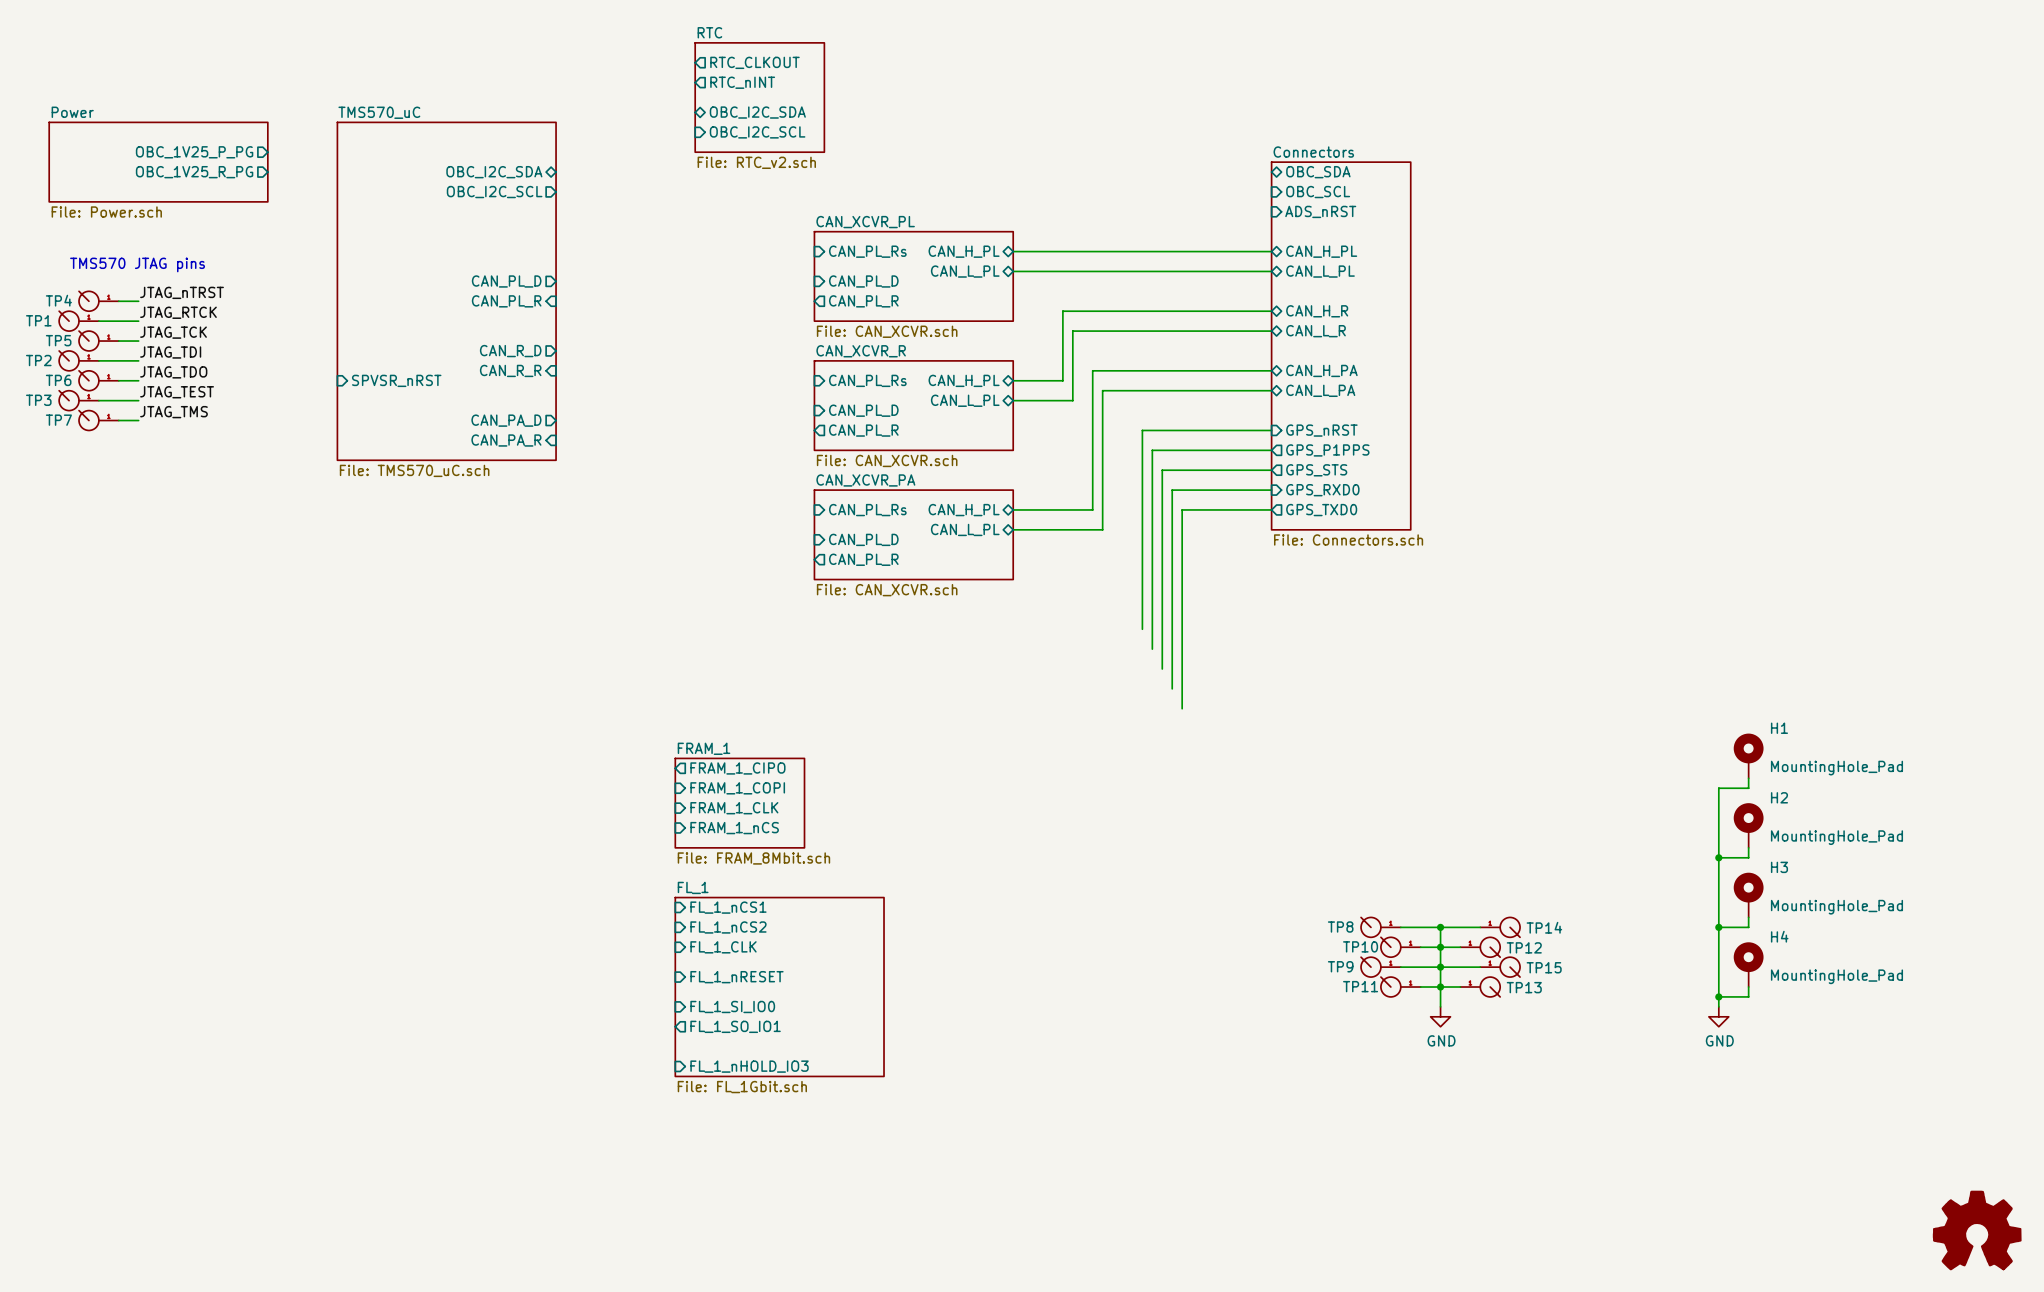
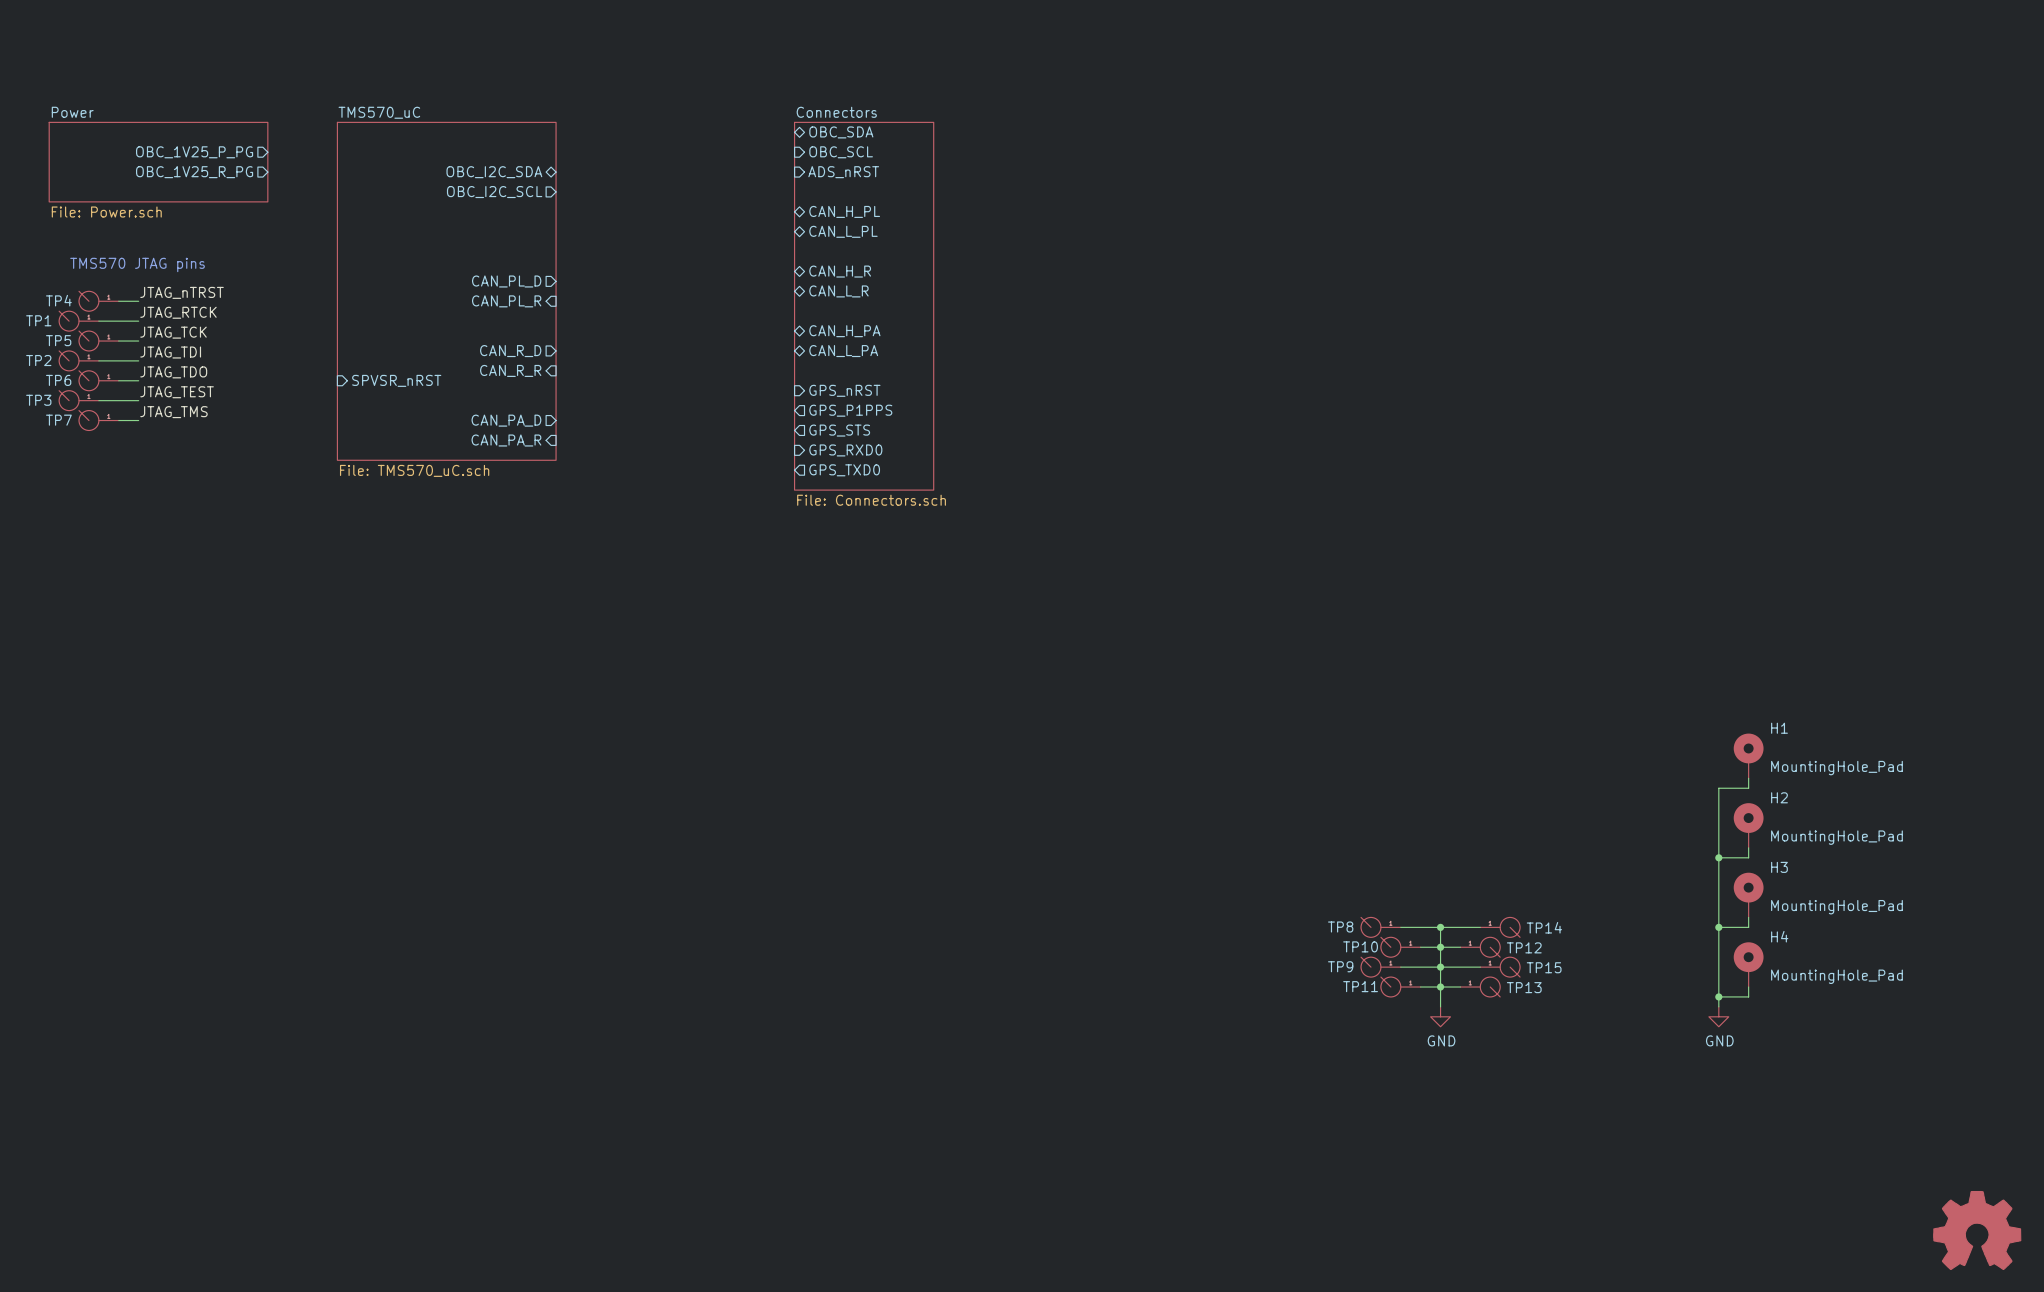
sheet pin: RTC_CLKOUT (754, 62) -> none
sheet pin: RTC_nINT (742, 82) -> none
sheet RTC: File: RTC_v2.sch (759, 97) -> none
sheet pin: OBC_I2C_SDA (757, 112) -> OBC_SDA (841, 132)
sheet pin: OBC_I2C_SCL (757, 132) -> OBC_SCL (841, 152)
sheet pin: none -> ADS_nRST (843, 172)
sheet pin: OBC_SDA (1318, 172) -> none
sheet pin: OBC_SCL (1318, 192) -> none
sheet pin: none -> CAN_H_PL (844, 211)
sheet pin: ADS_nRST (1320, 211) -> none
sheet pin: none -> CAN_L_PL (843, 231)
sheet pin: CAN_PL_Rs (867, 251) -> none
sheet pin: CAN_H_PL (964, 251) -> none
wire: (1013, 251) (1271, 251) -> none
sheet pin: CAN_H_PL (1321, 251) -> none
sheet pin: none -> CAN_H_R (840, 271)
sheet pin: CAN_L_PL (965, 271) -> none
wire: (1013, 271) (1271, 271) -> none
sheet pin: CAN_L_PL (1320, 271) -> none
sheet CAN_XCVR_PL: File: CAN_XCVR.sch (913, 276) -> none
sheet pin: CAN_PL_D (863, 281) -> none
sheet pin: none -> CAN_L_R (838, 291)
sheet pin: CAN_PL_R (863, 301) -> none
sheet Connectors: none -> File: Connectors.sch (864, 306)
wire: (1271, 311) (1062, 311) (1062, 380) (1013, 380) -> none
sheet pin: CAN_H_R (1317, 311) -> none
sheet pin: none -> CAN_H_PA (844, 331)
wire: (1271, 331) (1072, 331) (1072, 400) (1013, 400) -> none
sheet pin: CAN_L_R (1316, 331) -> none
sheet Connectors: File: Connectors.sch (1341, 345) -> none
sheet pin: none -> CAN_L_PA (843, 351)
wire: (1271, 370) (1092, 370) (1092, 509) (1013, 509) -> none
sheet pin: CAN_H_PA (1321, 370) -> none
sheet pin: CAN_PL_Rs (867, 380) -> none
sheet pin: CAN_H_PL (964, 380) -> none
sheet pin: none -> GPS_nRST (844, 390)
wire: (1271, 390) (1102, 390) (1102, 529) (1013, 529) -> none
sheet pin: CAN_L_PA (1320, 390) -> none
sheet pin: CAN_L_PL (965, 400) -> none
sheet CAN_XCVR_R: File: CAN_XCVR.sch (913, 405) -> none
sheet pin: none -> GPS_P1PPS (850, 410)
sheet pin: CAN_PL_D (863, 410) -> none
sheet pin: none -> GPS_STS (839, 430)
sheet pin: CAN_PL_R (863, 430) -> none
wire: (1271, 430) (1142, 430) (1142, 629) -> none
sheet pin: GPS_nRST (1321, 430) -> none
sheet pin: none -> GPS_RXD0 (845, 450)
wire: (1271, 450) (1152, 450) (1152, 649) -> none
sheet pin: GPS_P1PPS (1327, 450) -> none
sheet pin: none -> GPS_TXD0 (844, 470)
wire: (1271, 470) (1162, 470) (1162, 668) -> none
sheet pin: GPS_STS (1316, 470) -> none
wire: (1271, 490) (1172, 490) (1172, 688) -> none
sheet pin: GPS_RXD0 (1322, 490) -> none
wire: (1271, 509) (1182, 509) (1182, 708) -> none
sheet pin: CAN_PL_Rs (867, 510) -> none
sheet pin: CAN_H_PL (964, 510) -> none
sheet pin: GPS_TXD0 (1321, 510) -> none
sheet pin: CAN_L_PL (965, 529) -> none
sheet CAN_XCVR_PA: File: CAN_XCVR.sch (913, 534) -> none
sheet pin: CAN_PL_D (863, 539) -> none
sheet pin: CAN_PL_R (863, 559) -> none
sheet pin: FRAM_1_CIPO (737, 768) -> none
sheet pin: FRAM_1_COPI (737, 788) -> none
sheet FRAM_1: File: FRAM_8Mbit.sch (739, 803) -> none
sheet pin: FRAM_1_CLK (734, 808) -> none
sheet pin: FRAM_1_nCS (734, 828) -> none
sheet pin: FL_1_nCS1 (728, 907) -> none
sheet pin: FL_1_nCS2 (728, 927) -> none
sheet pin: FL_1_CLK (723, 947) -> none
sheet pin: FL_1_nRESET (736, 977) -> none
sheet FL_1: File: FL_1Gbit.sch (779, 987) -> none
sheet pin: FL_1_SI_IO0 (732, 1006) -> none
sheet pin: FL_1_SO_IO1 (735, 1026) -> none
sheet pin: FL_1_nHOLD_IO3 (749, 1066) -> none

